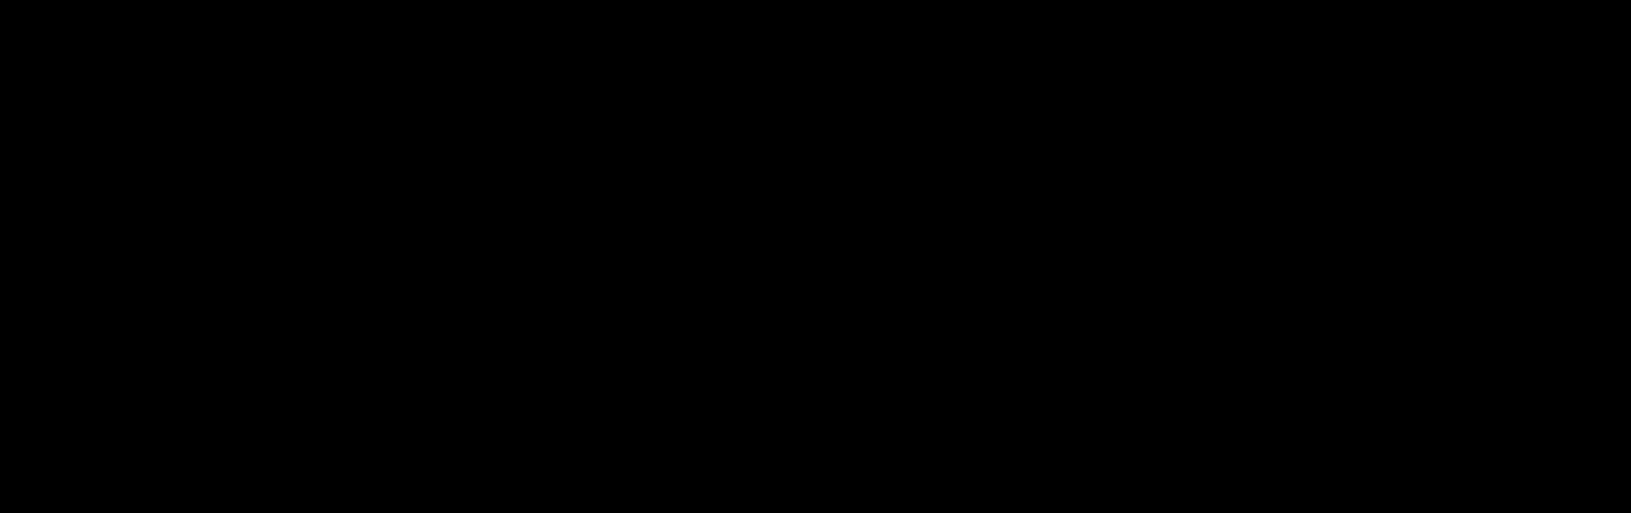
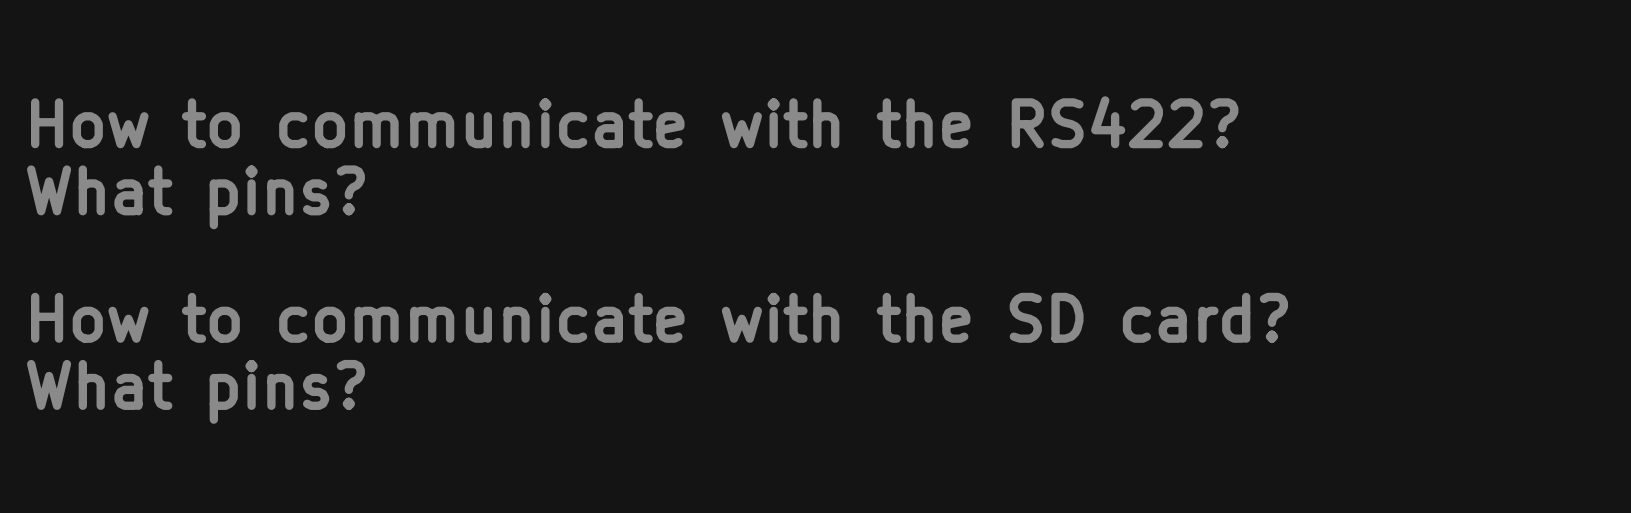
text: none -> How to communicate with the RS422? (634, 122)
text: none -> What pins? (195, 197)
text: none -> How to communicate with the SD card? (659, 317)
text: none -> What pins? (195, 391)

